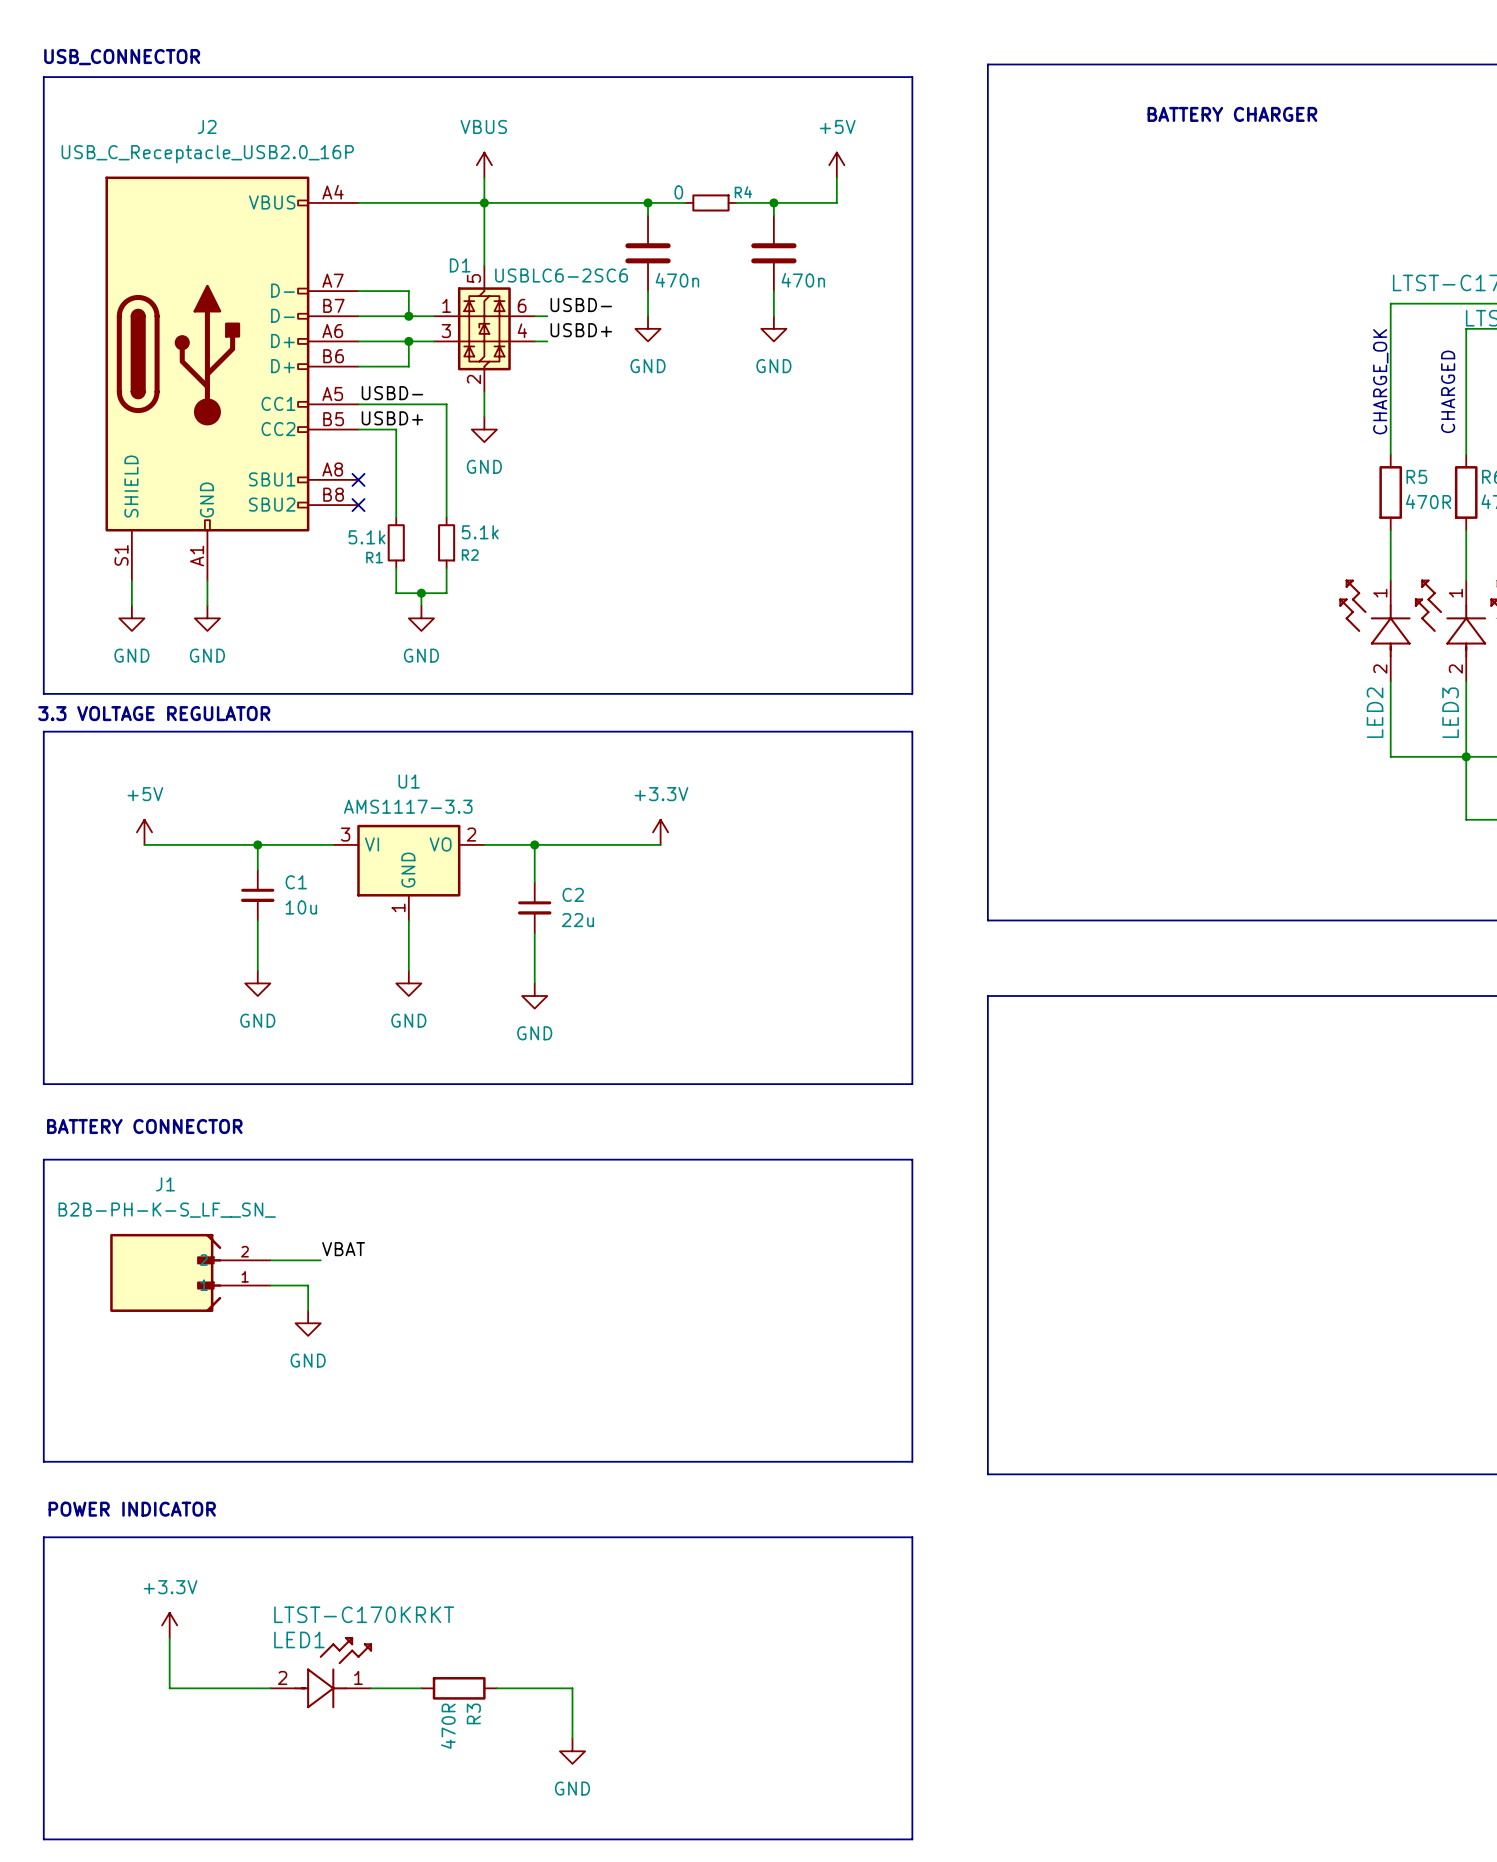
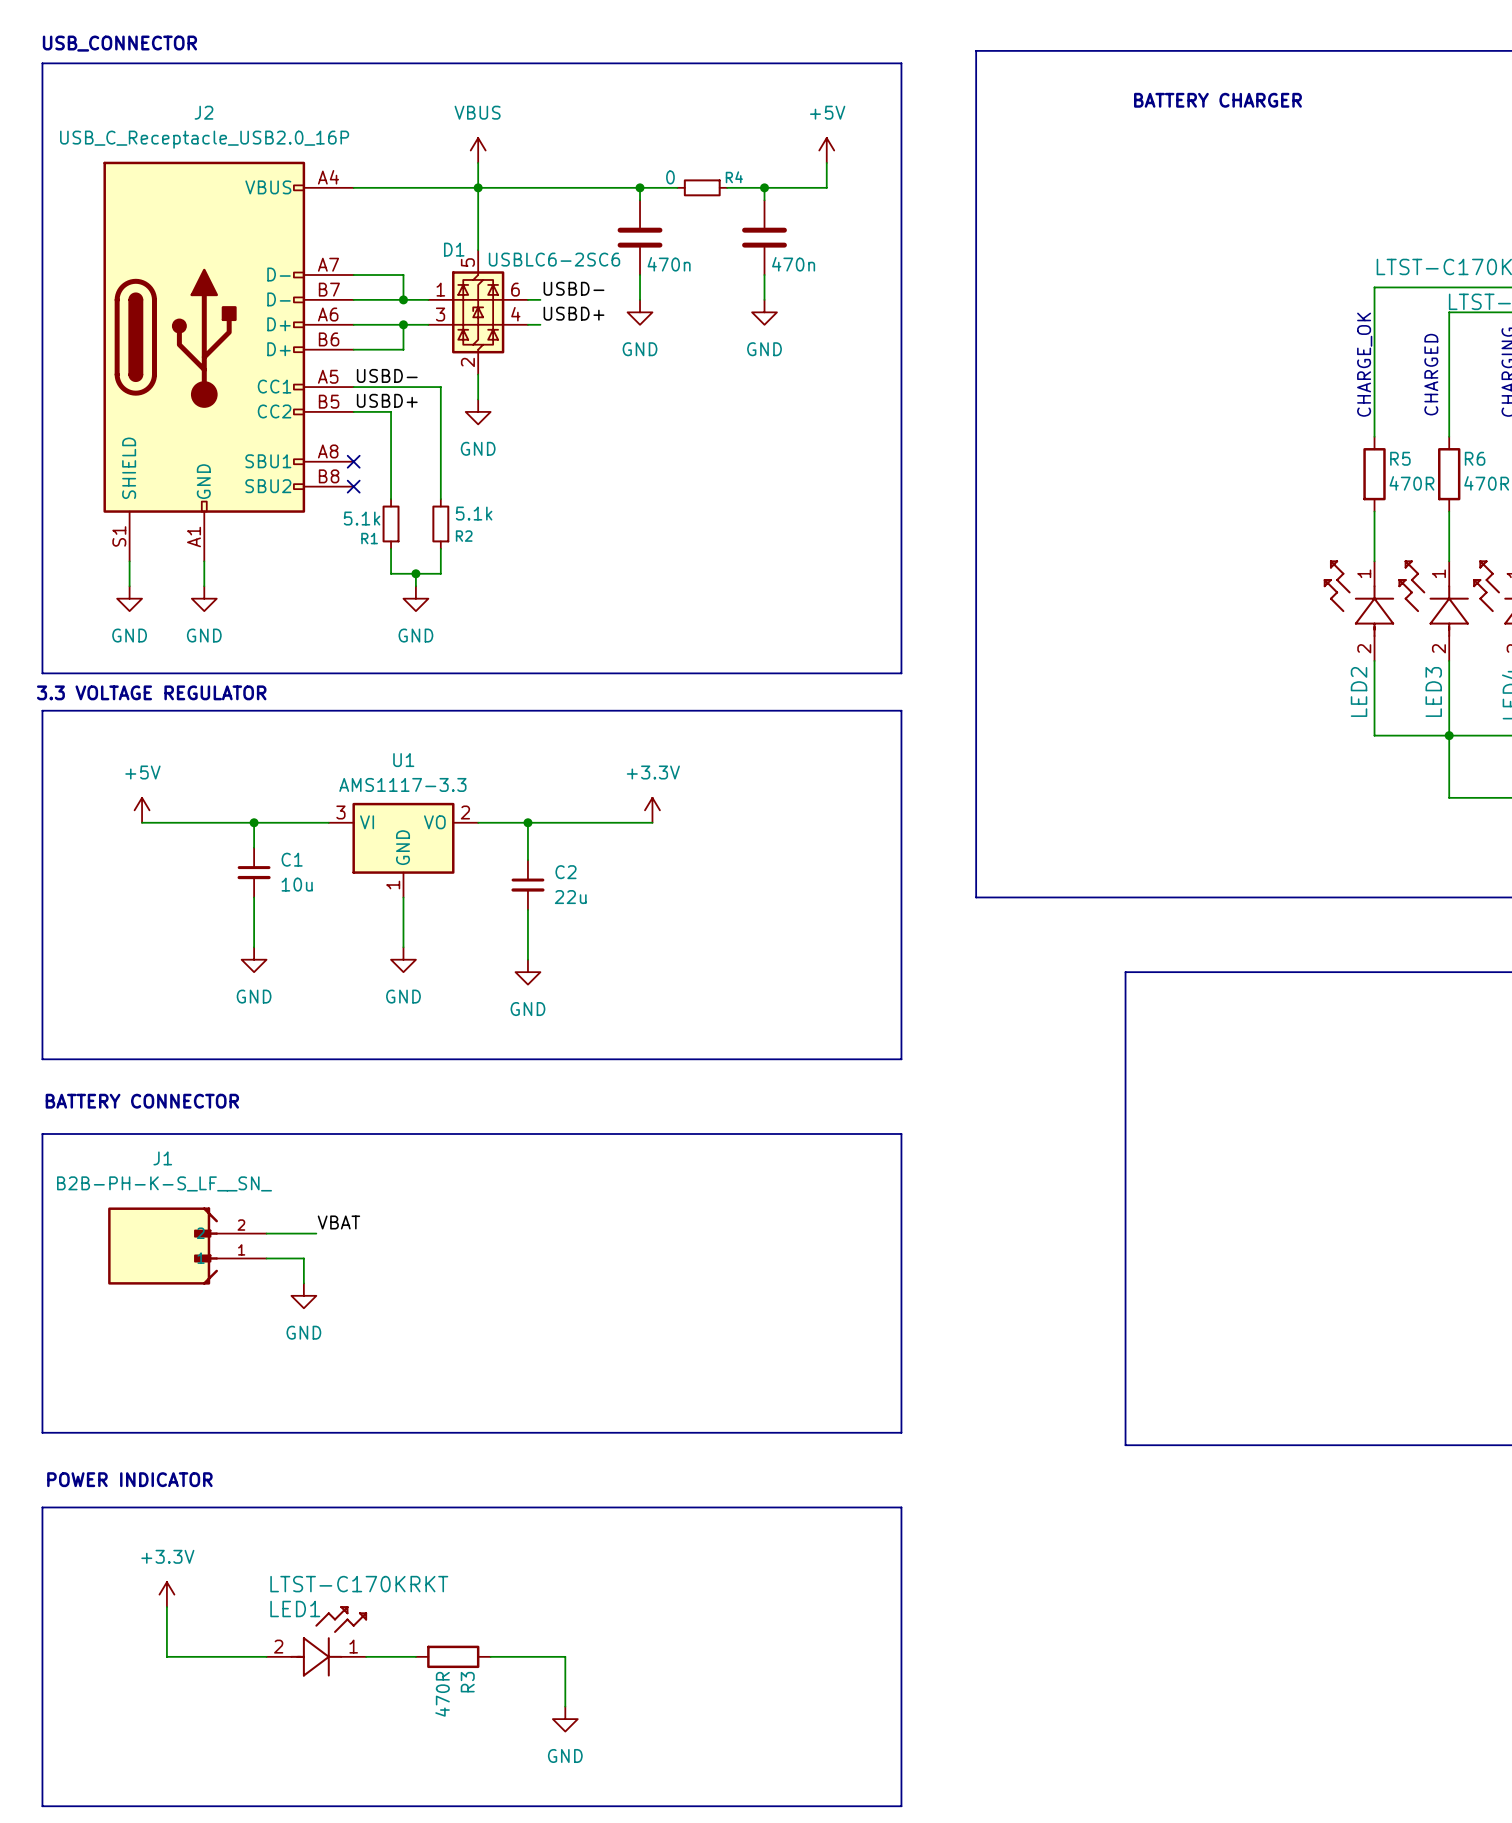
line: (1138, 996) (987, 996) (987, 1474) (1138, 1474) -> (1125, 972) (1125, 1445)

